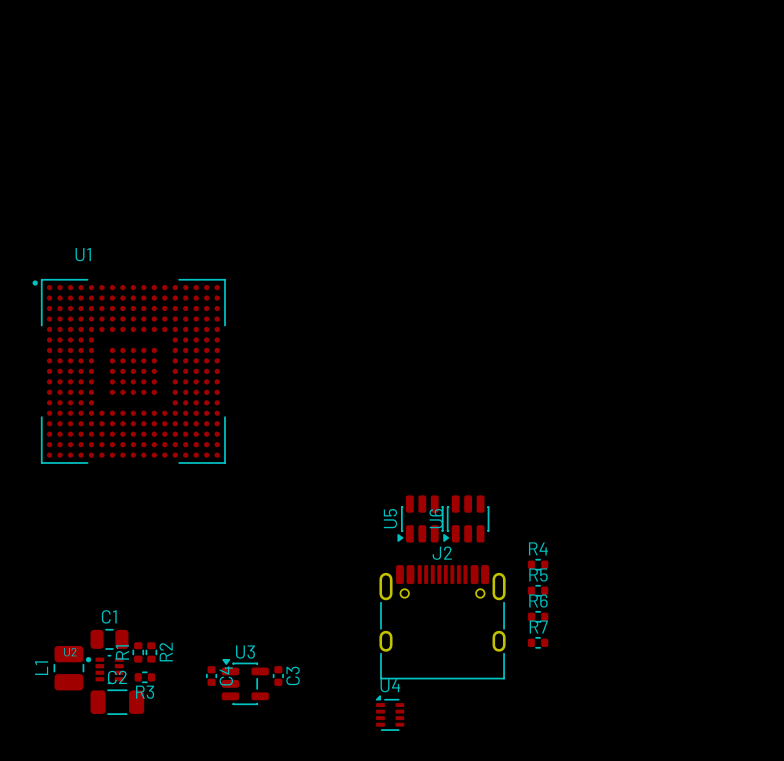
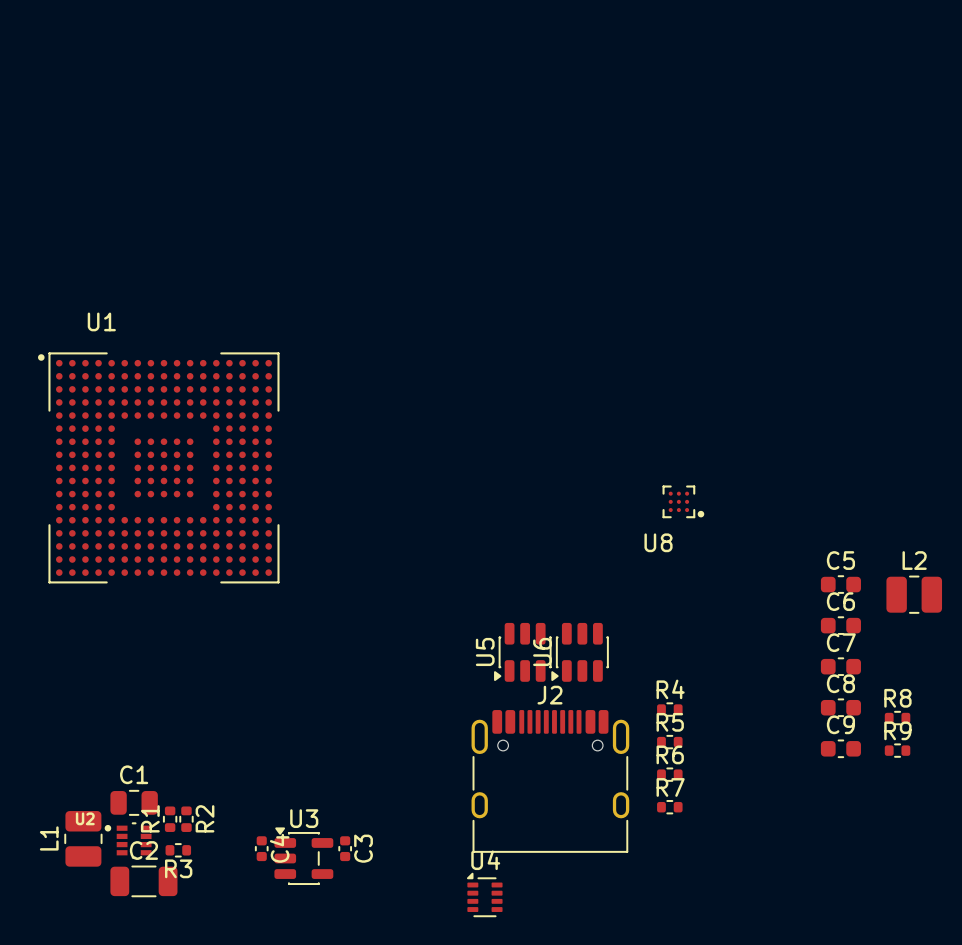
U8: none -> (683, 501)
C5: none -> (840, 584)
L2: none -> (914, 594)
C6: none -> (840, 625)
C7: none -> (840, 666)
C8: none -> (840, 707)
R8: none -> (897, 718)
C9: none -> (840, 748)
R9: none -> (897, 750)

